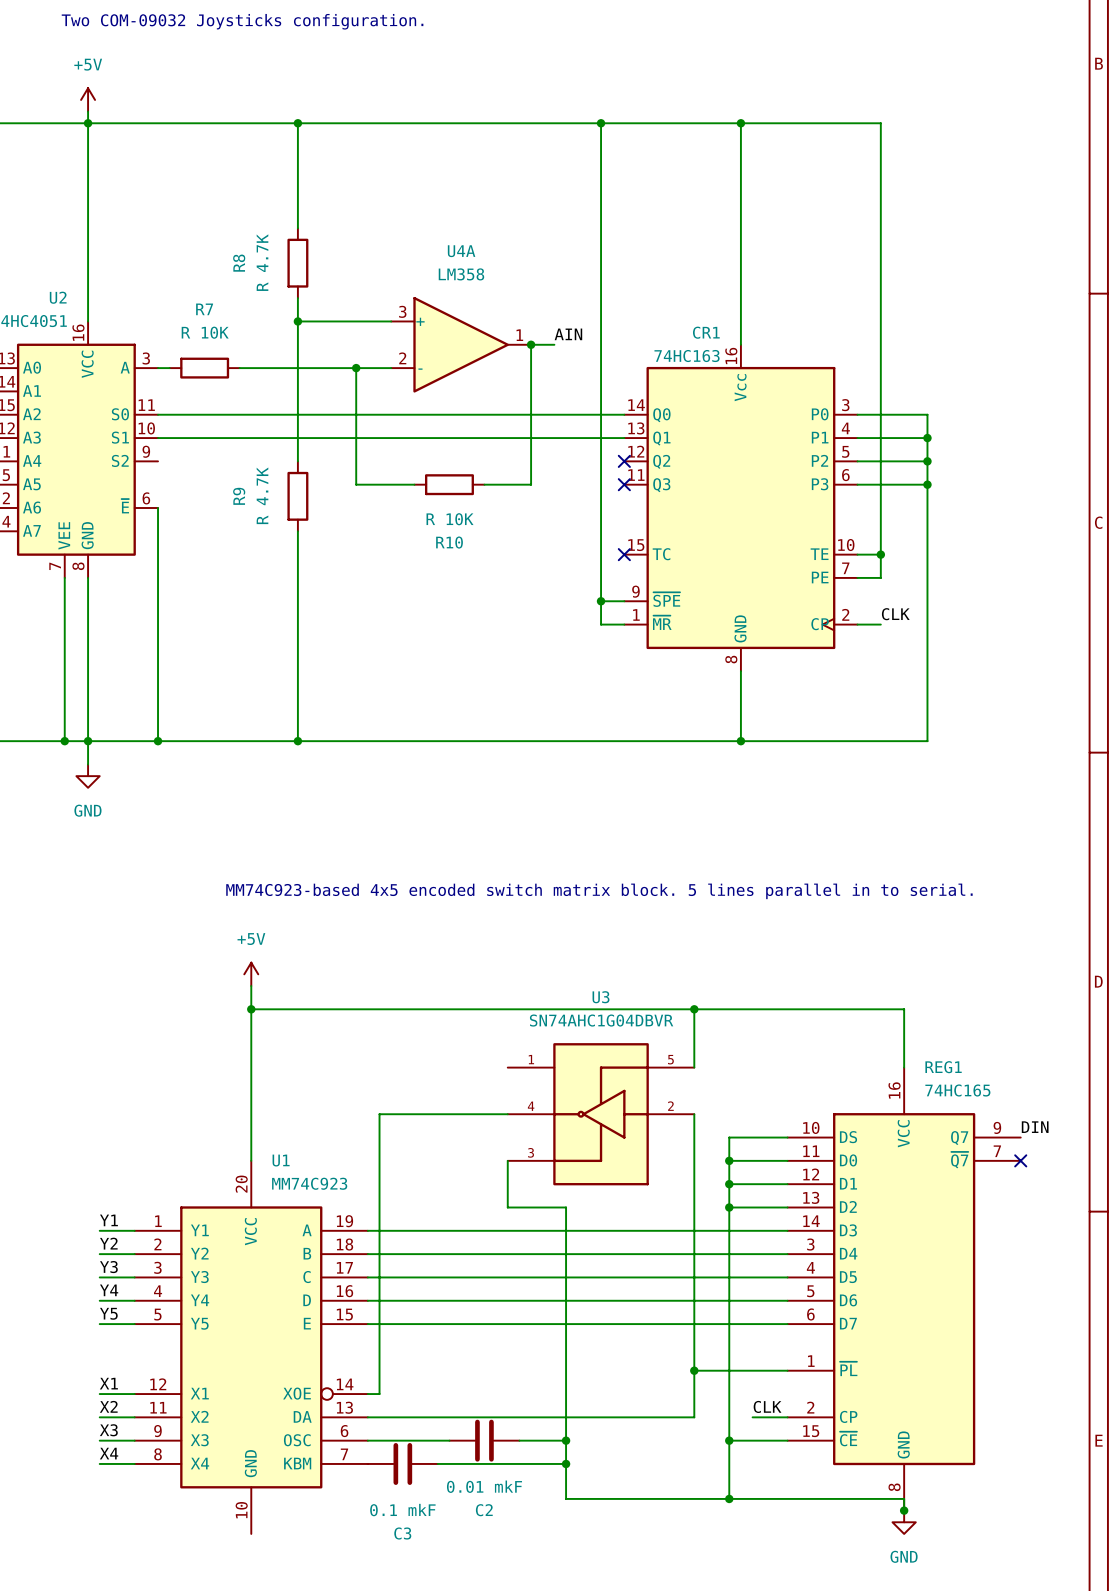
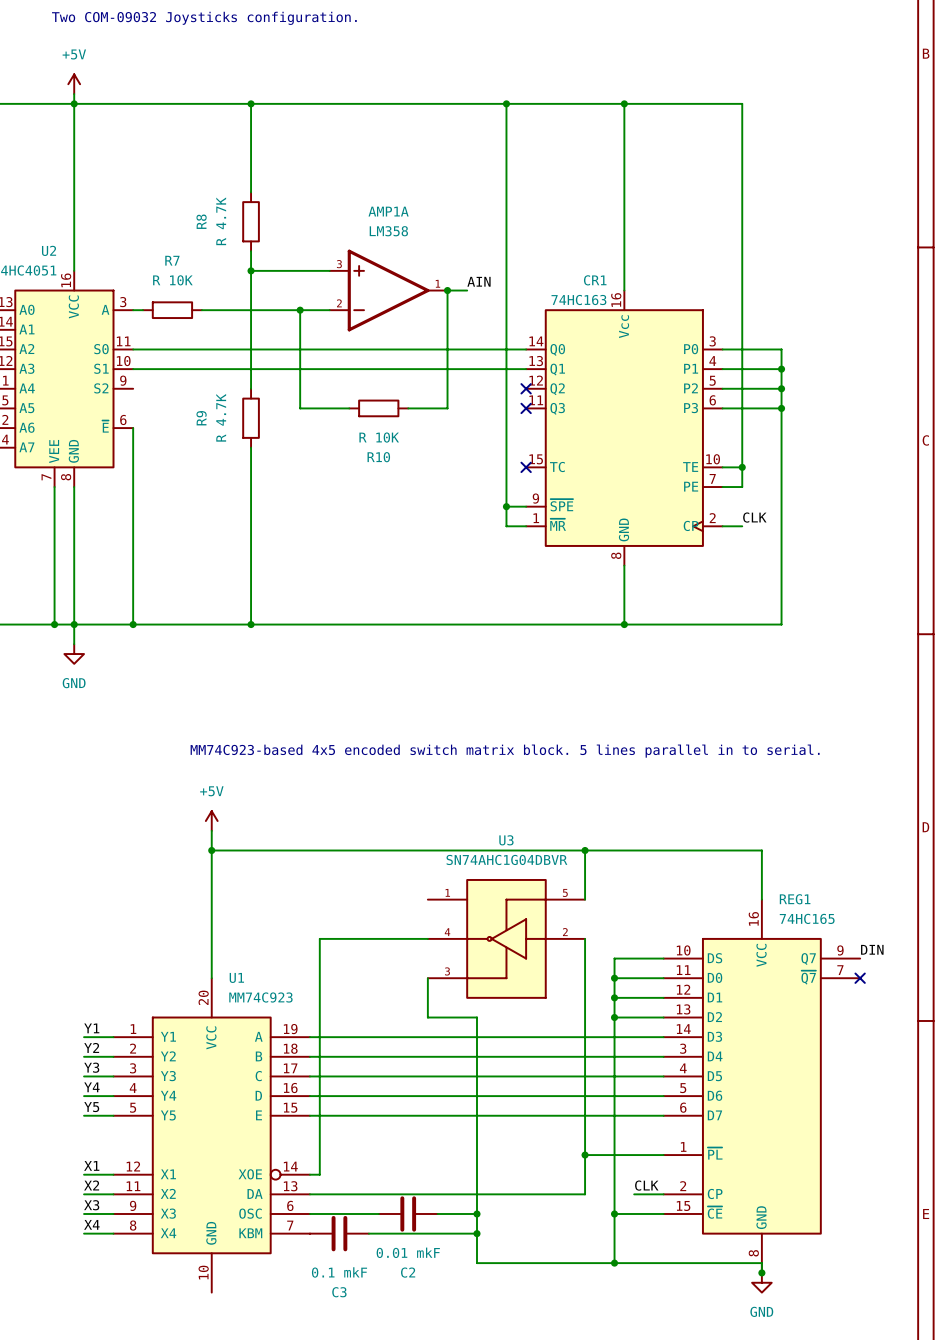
U4A: LM358 (461, 344) -> none
AMP1A: none -> LM358 (388, 290)

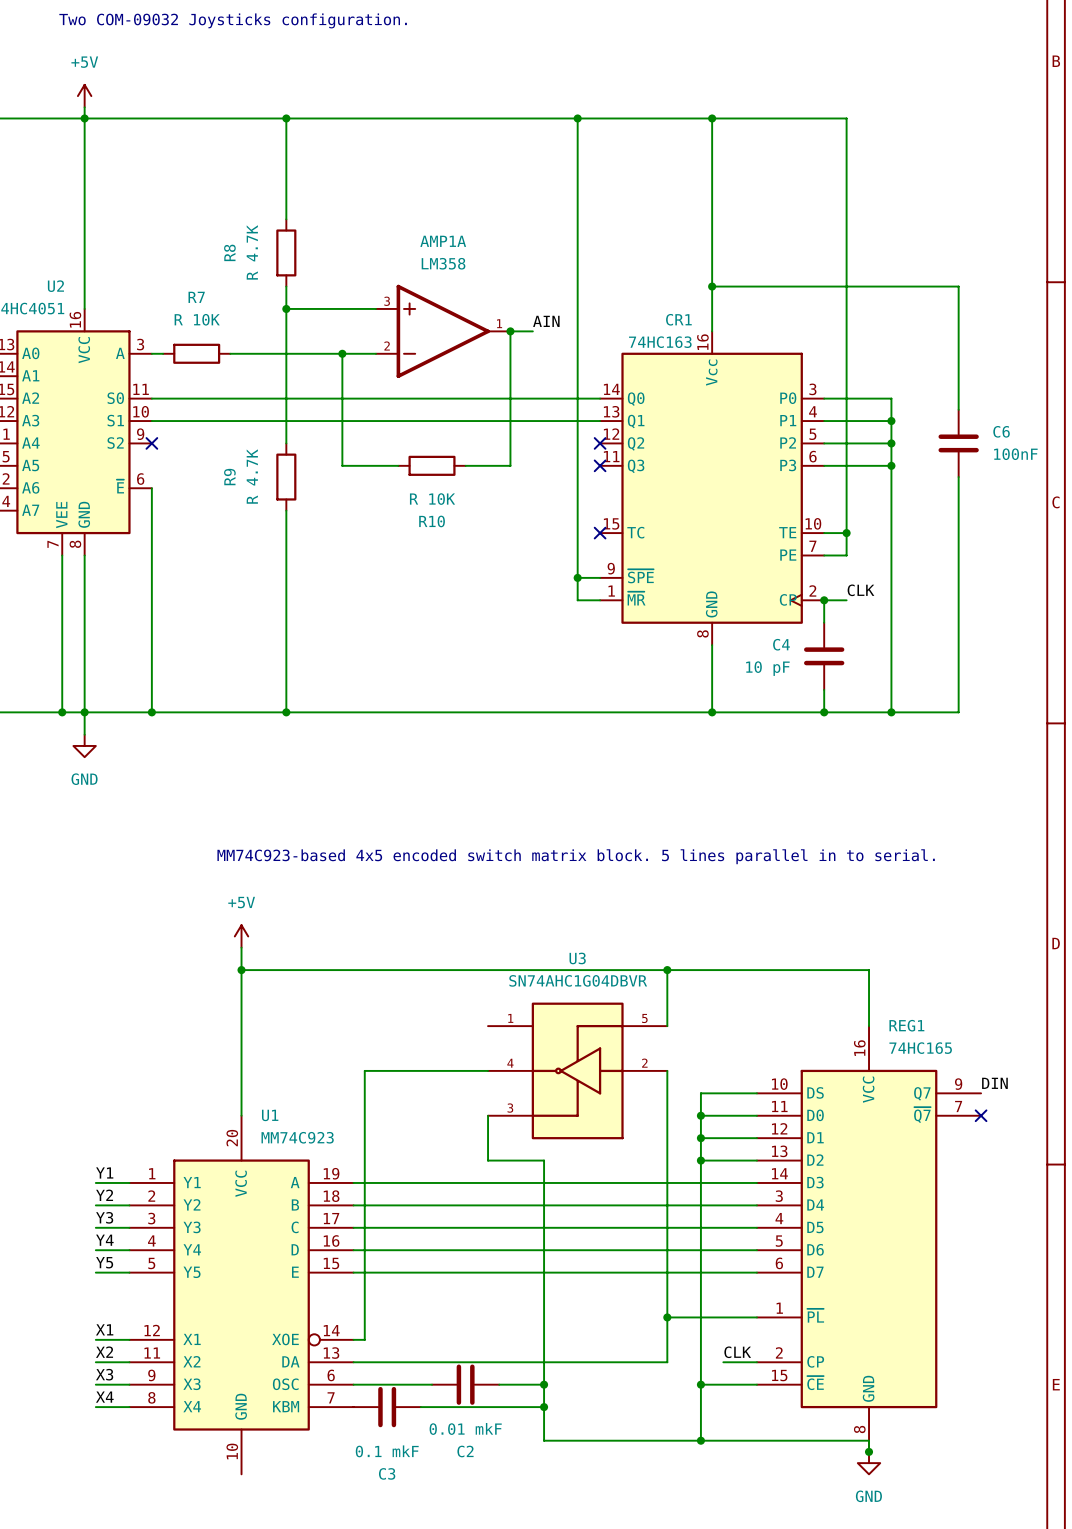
wire: none -> (712, 286) (958, 286) (958, 409)
junction: none -> (712, 286)
no-connect mark: none -> (151, 443)
C6: none -> 100nF (958, 443)
wire: none -> (958, 477) (958, 712) (891, 712)
wire: none -> (824, 600) (824, 622)
junction: none -> (824, 600)
C4: none -> 10 pF (824, 656)
wire: none -> (824, 689) (824, 712)
junction: none -> (824, 712)
junction: none -> (891, 712)

